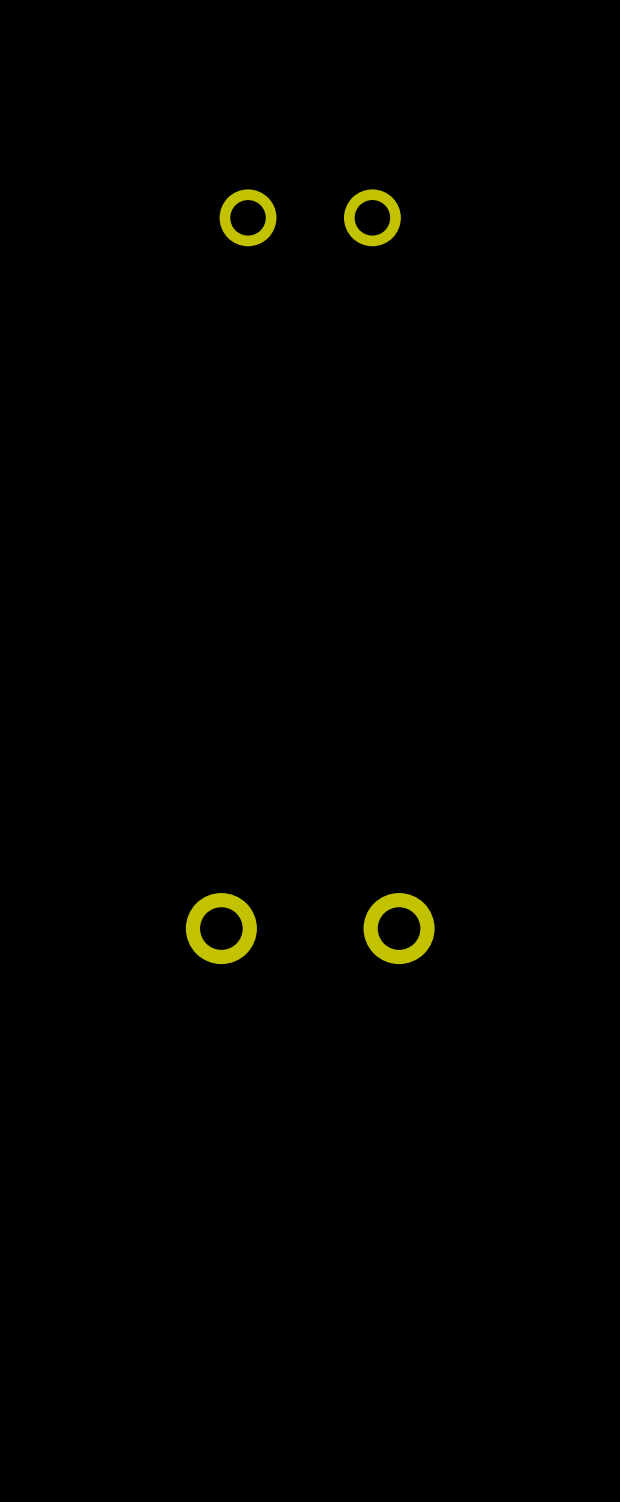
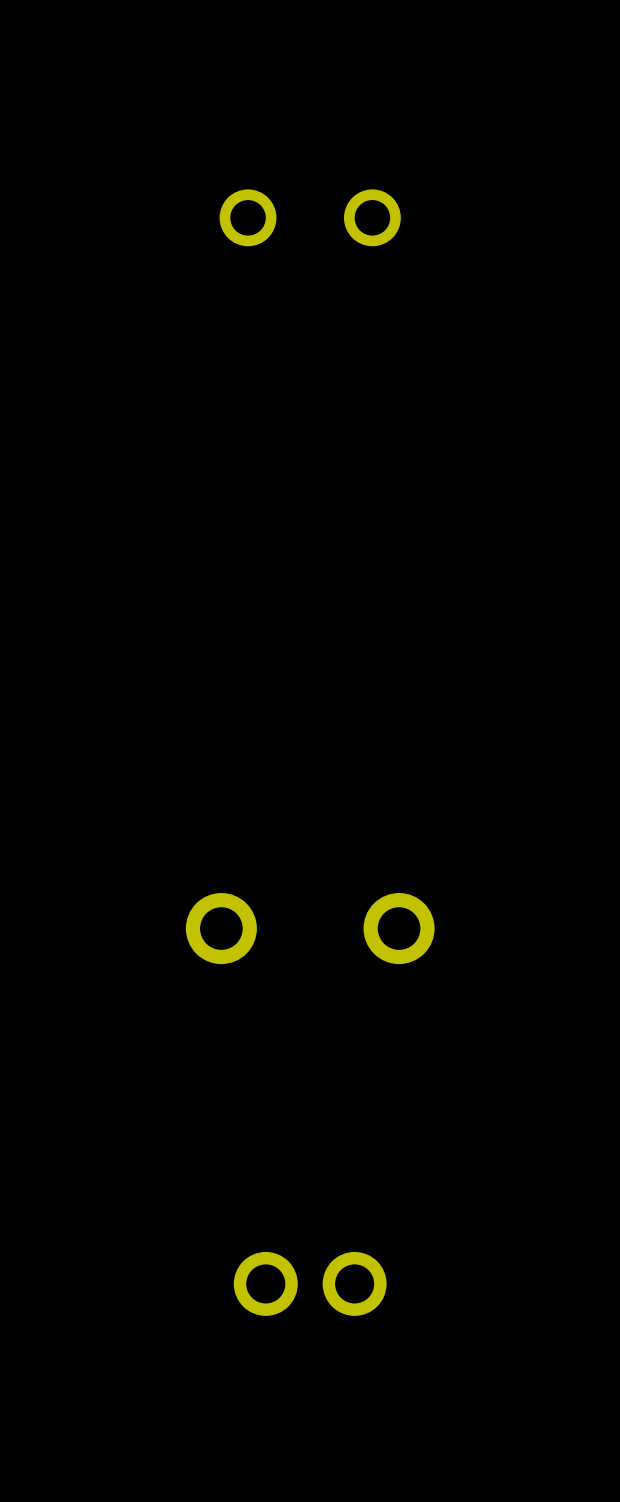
part: none -> (310, 1283)

